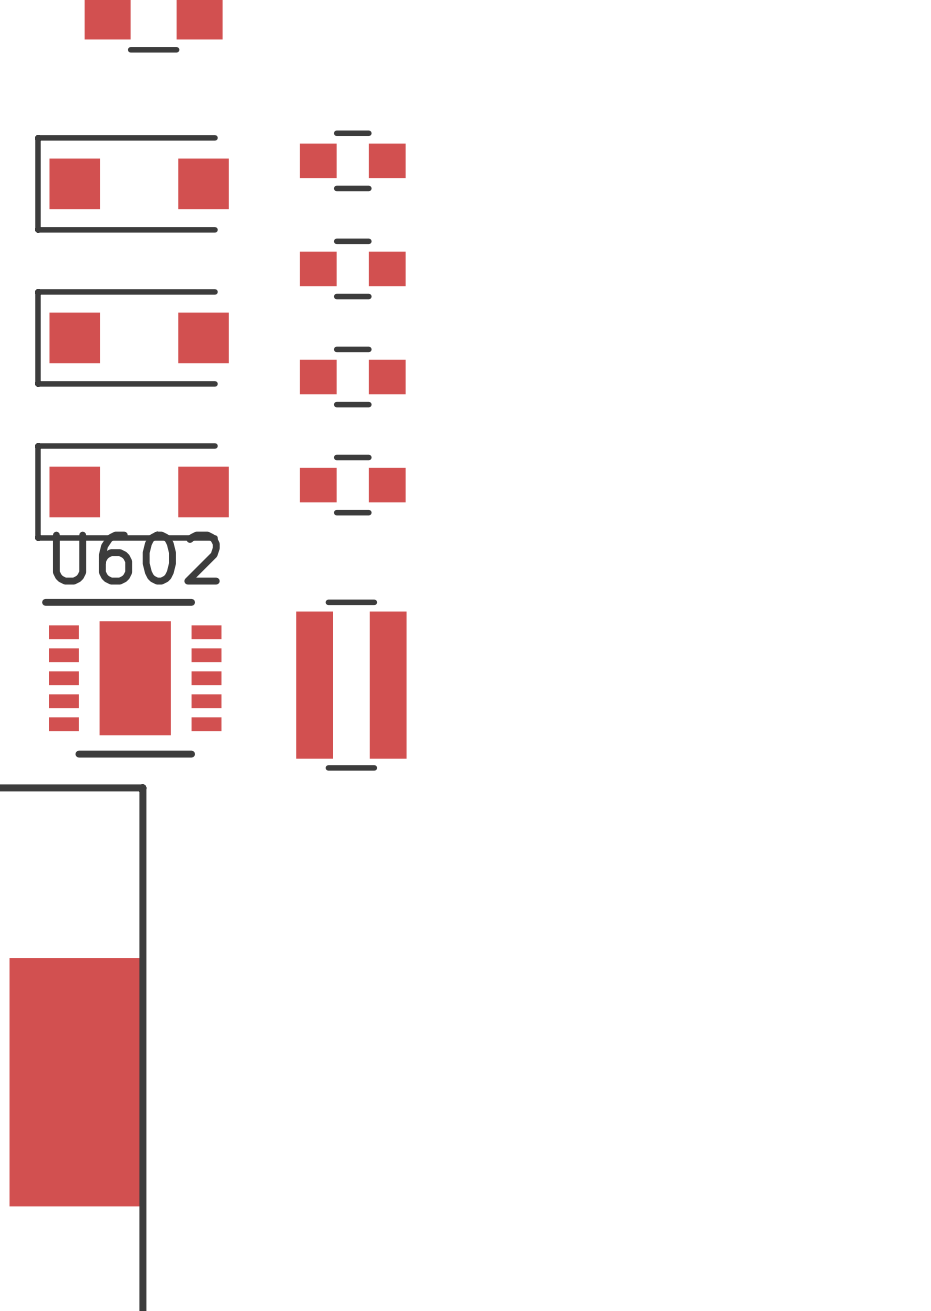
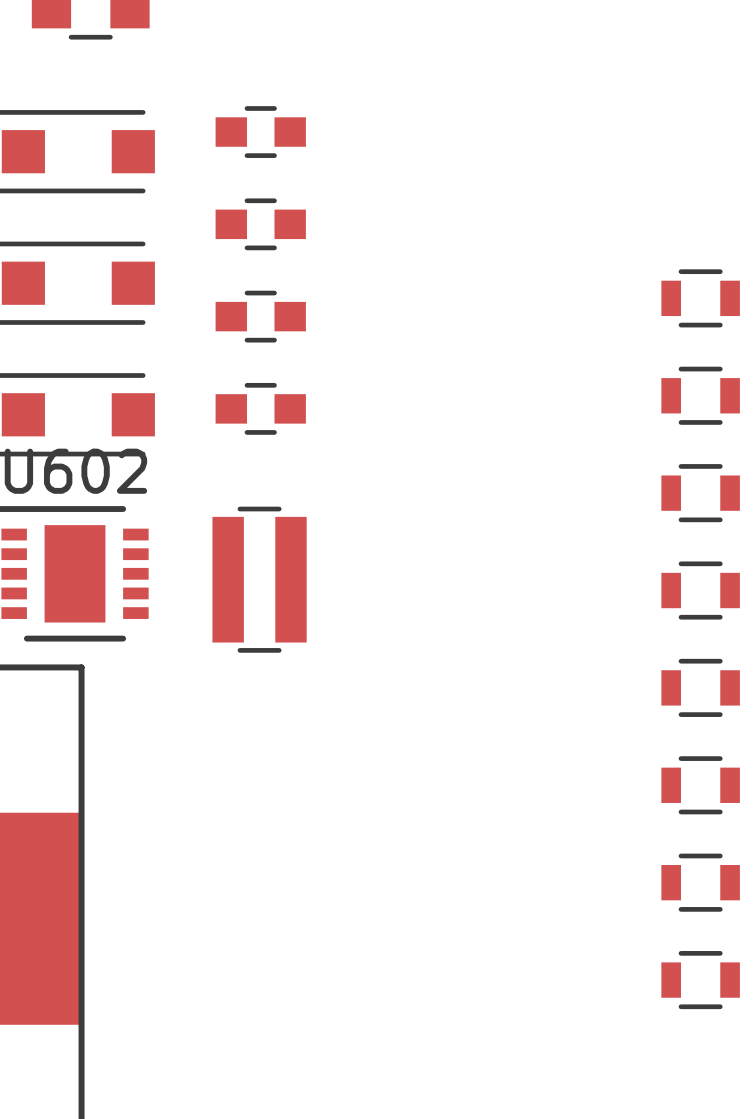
part: none -> (700, 298)
part: none -> (700, 395)
part: none -> (700, 493)
part: none -> (700, 590)
part: none -> (700, 687)
part: none -> (700, 785)
part: none -> (700, 882)
part: none -> (700, 980)

